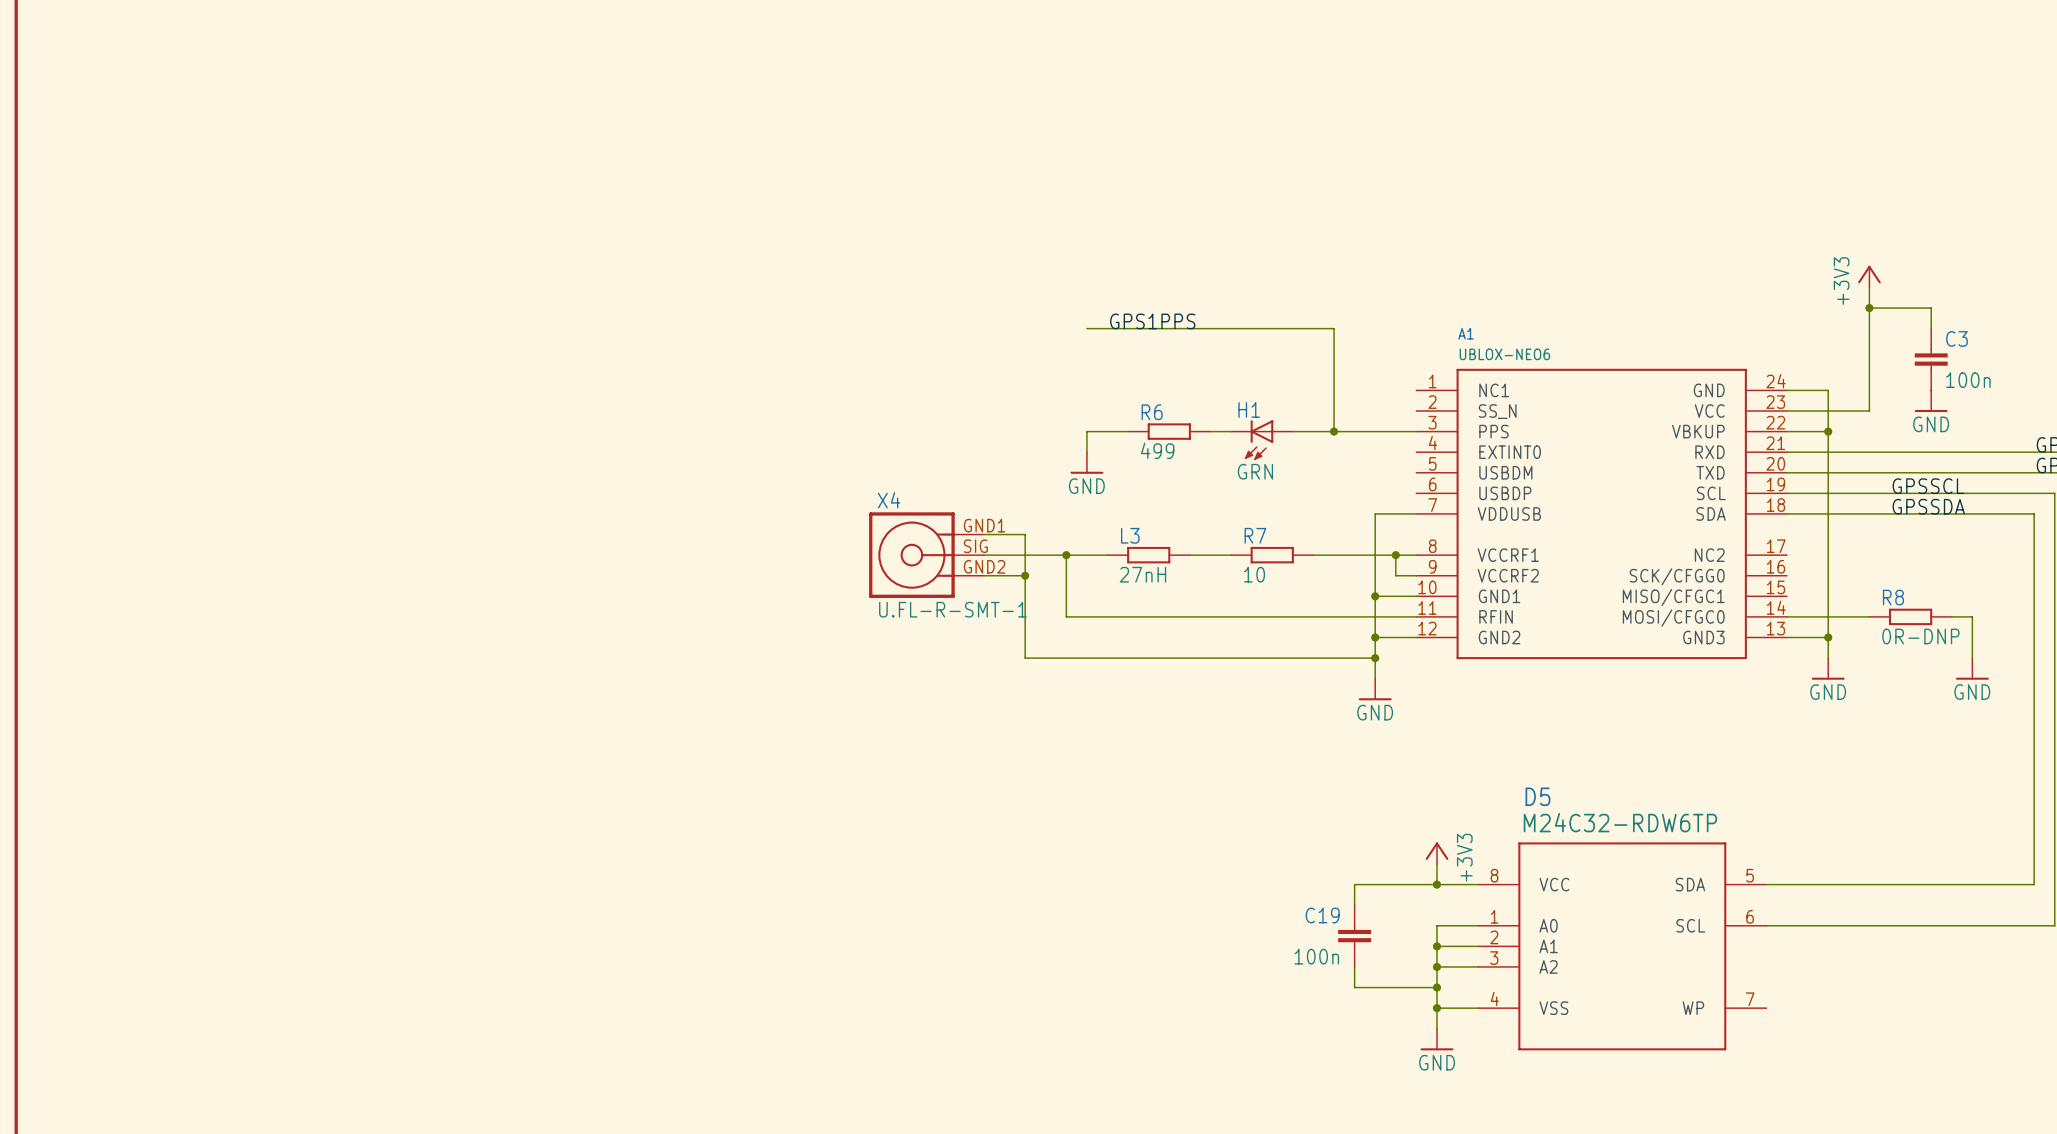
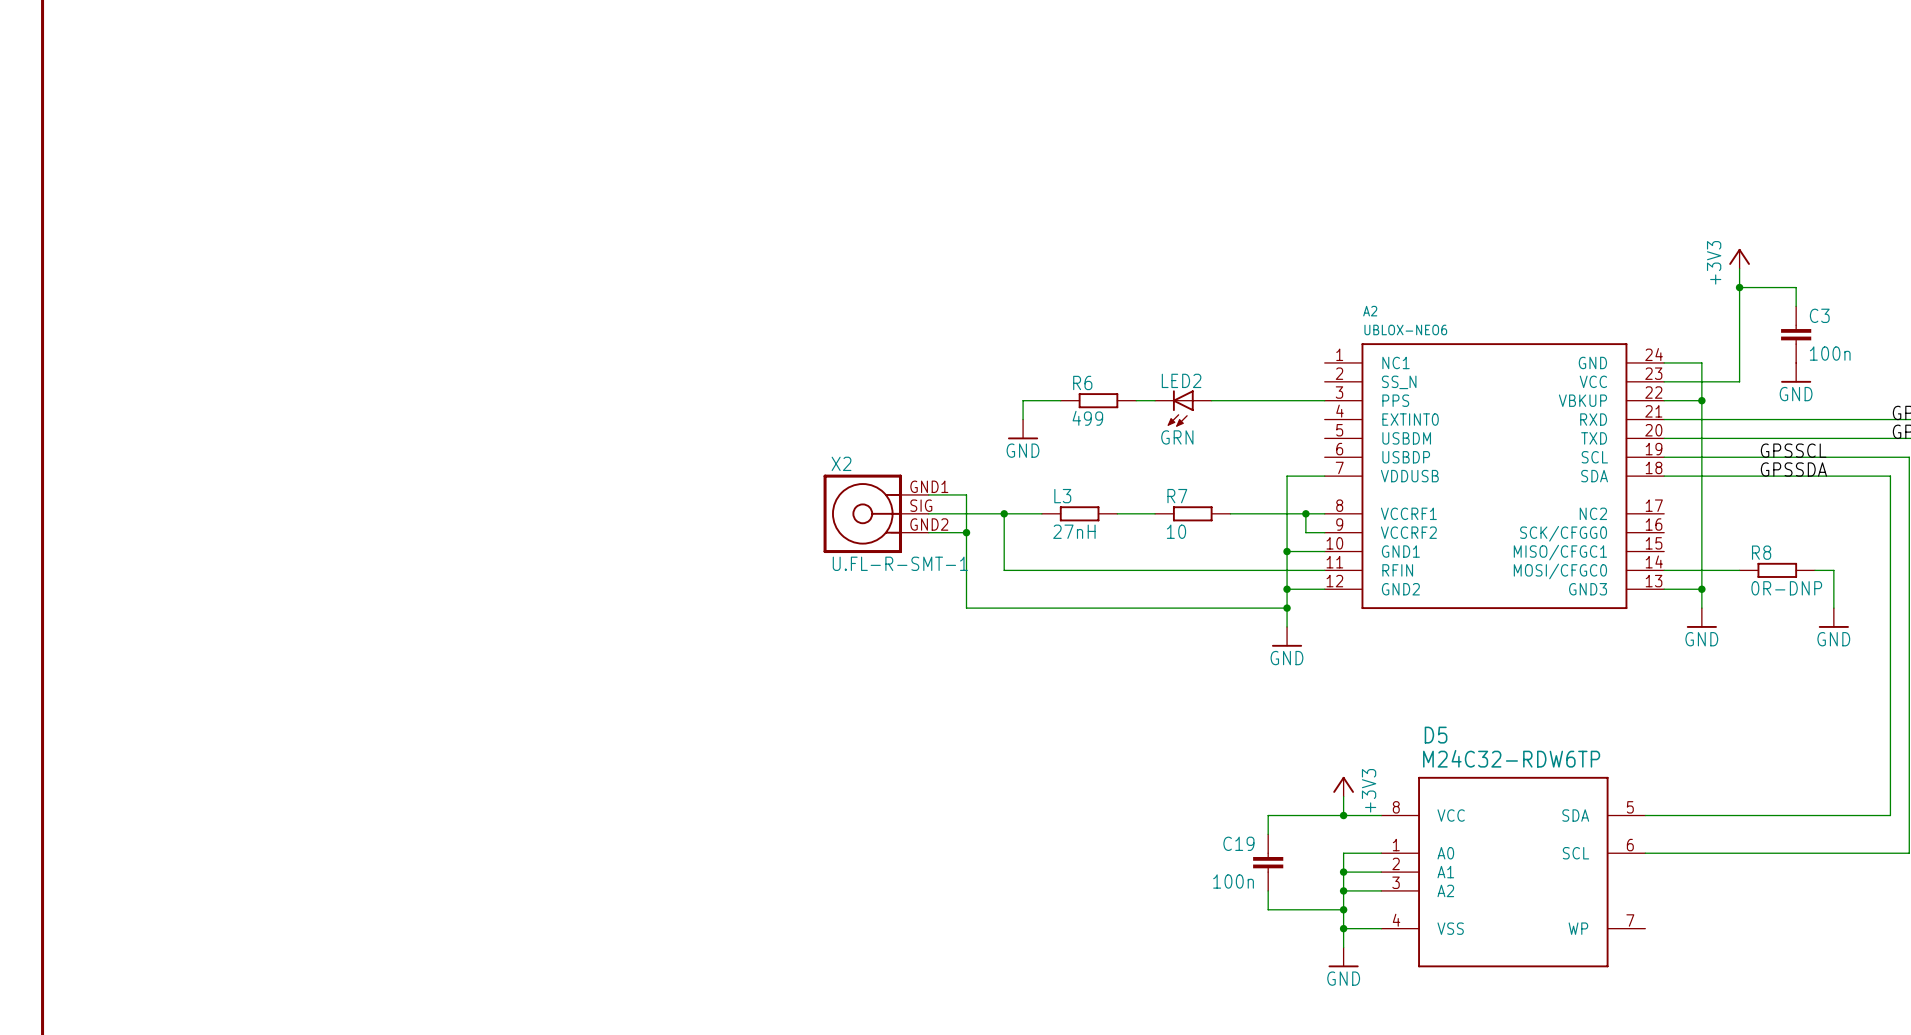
label: GPS1PPS (1152, 321) -> none
wire: (1086, 328) (1334, 328) (1334, 431) -> none
A1 name: A1 (1466, 333) -> A2 (1370, 311)
H1 name: H1 (1249, 409) -> LED2 (1181, 380)
junction: (1334, 431) -> none
X4 name: X4 (888, 500) -> X2 (841, 463)

